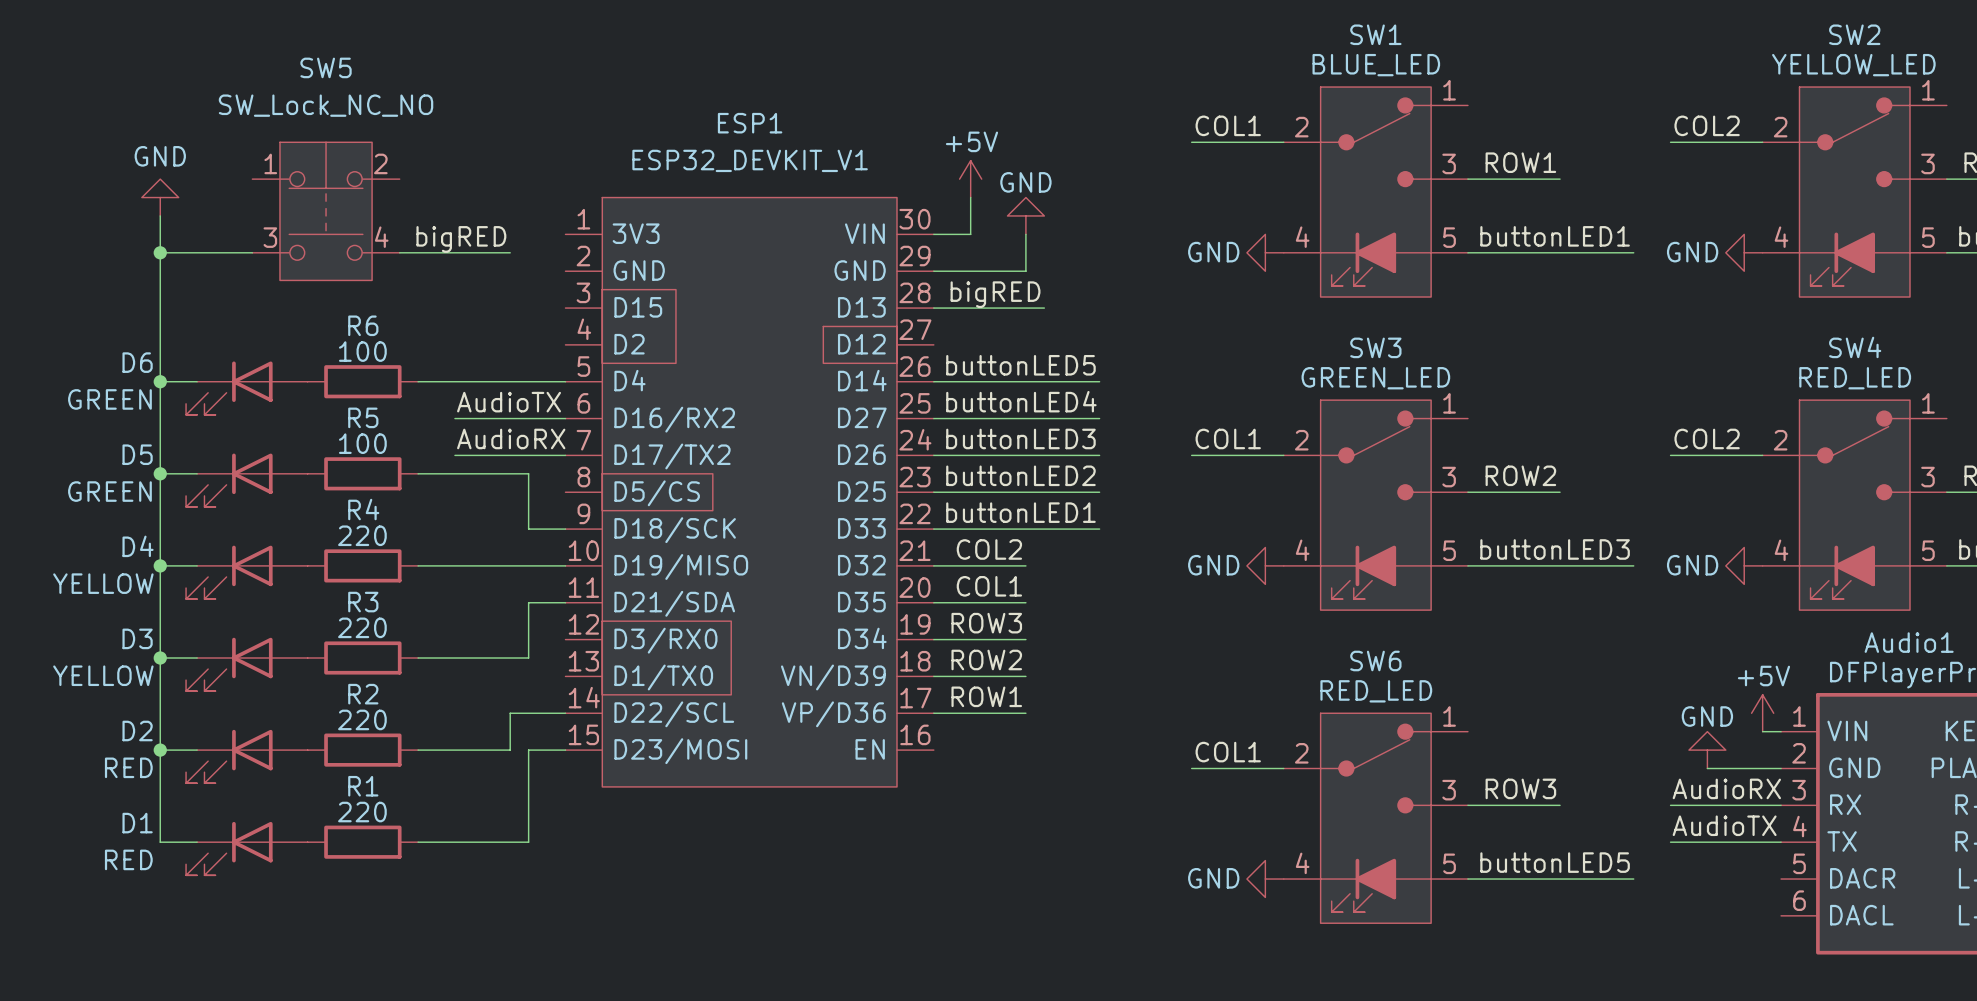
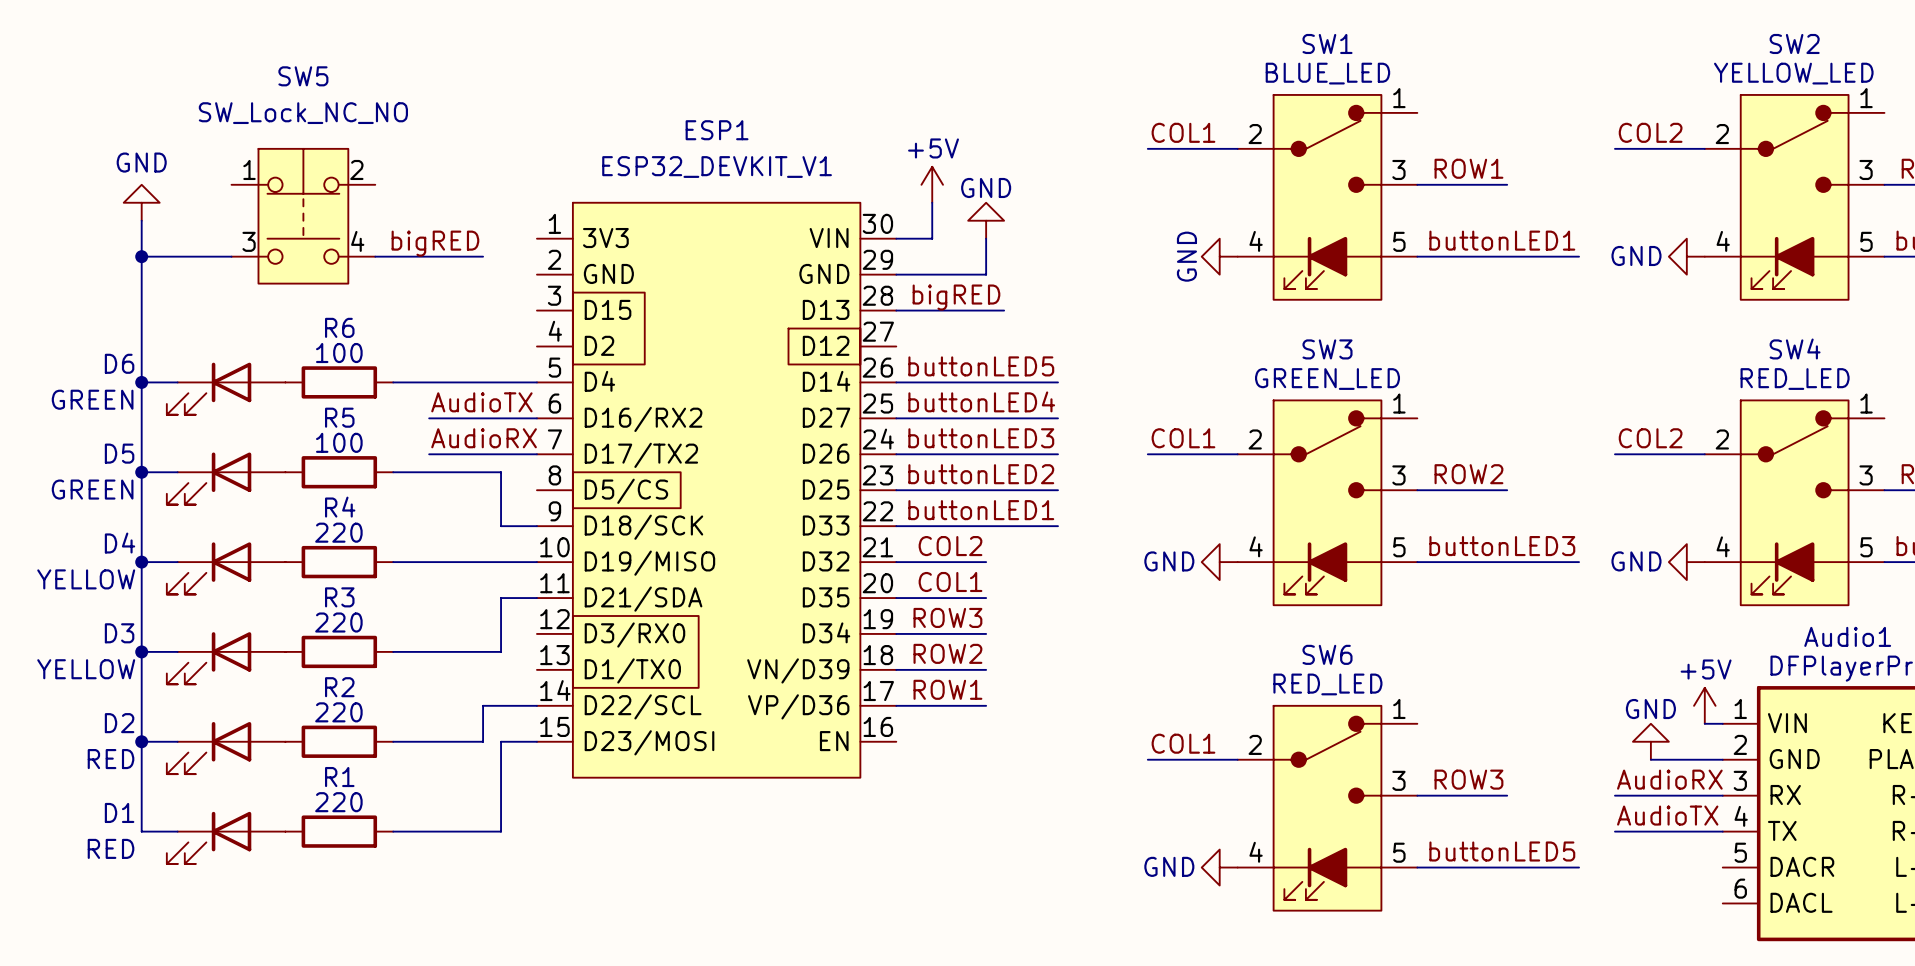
power symbol text rotation: 0° (1213, 252) -> 90° counterclockwise (1186, 256)

